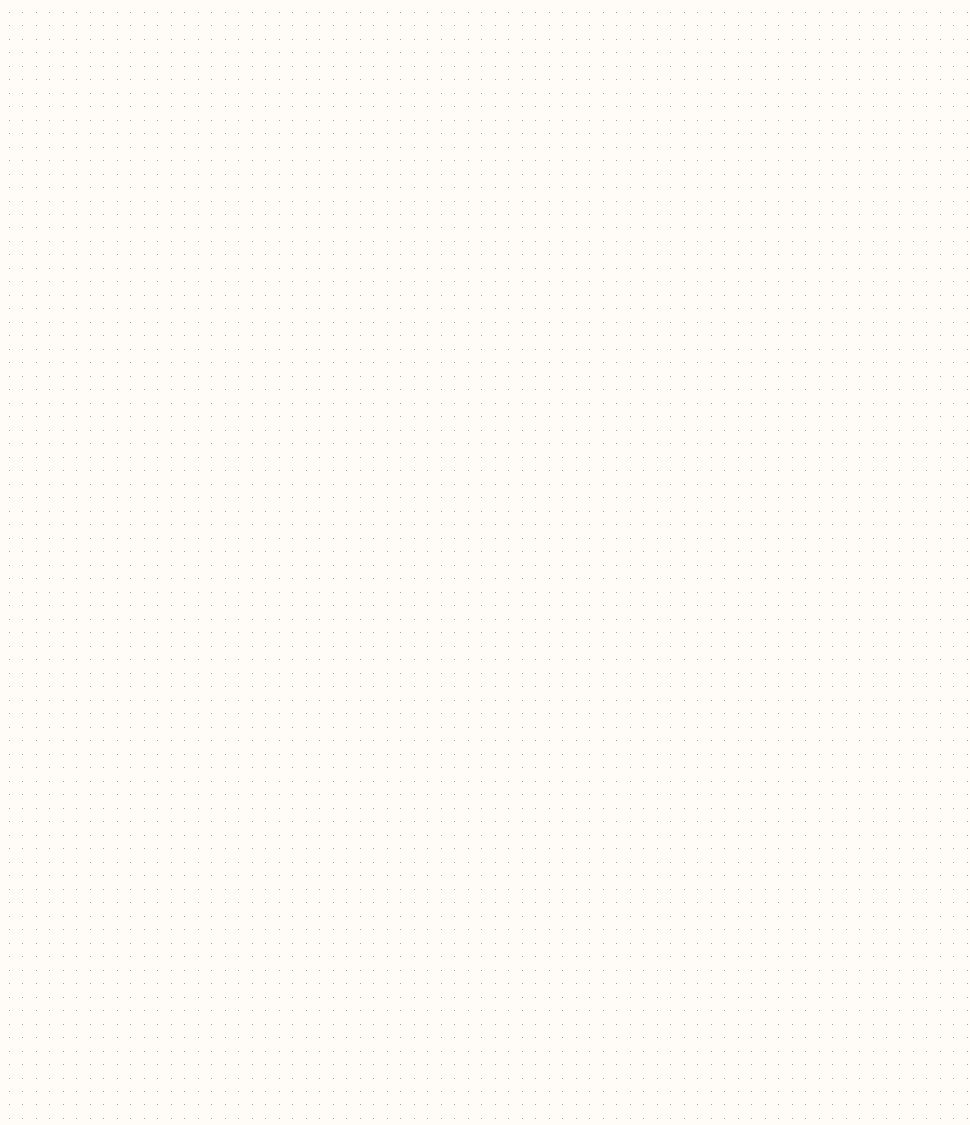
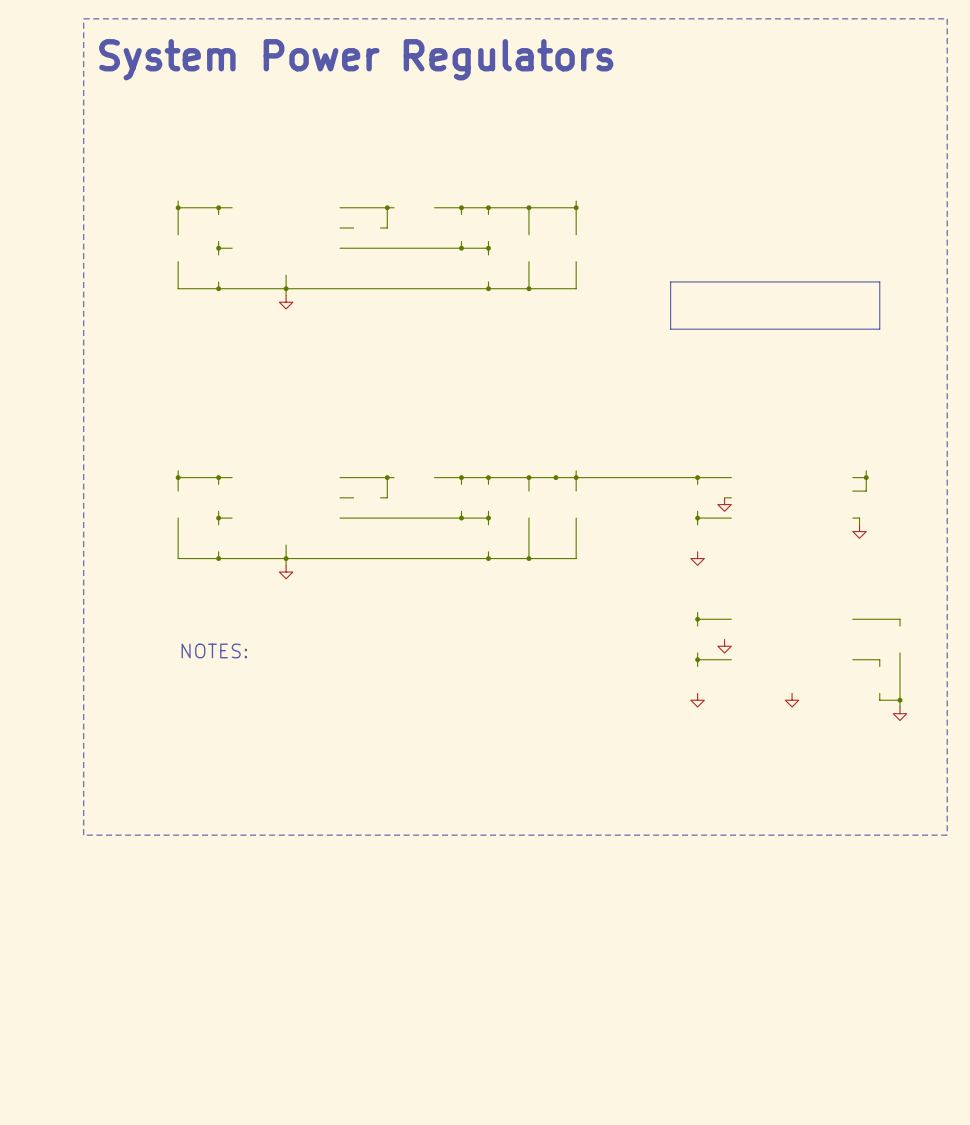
line: none -> (83, 18) (947, 18) (947, 835) (83, 835) (83, 18)
text: none -> System Power Regulators (356, 59)
wire: none -> (178, 201) (178, 234)
wire: none -> (576, 201) (576, 234)
wire: none -> (178, 207) (232, 207)
junction: none -> (178, 207)
wire: none -> (218, 207) (218, 214)
junction: none -> (218, 207)
wire: none -> (340, 207) (394, 207)
wire: none -> (387, 207) (387, 227) (380, 227)
junction: none -> (387, 207)
wire: none -> (434, 207) (576, 207)
wire: none -> (461, 207) (461, 214)
junction: none -> (461, 207)
wire: none -> (488, 207) (488, 214)
junction: none -> (488, 207)
wire: none -> (528, 207) (528, 234)
junction: none -> (528, 207)
junction: none -> (576, 207)
wire: none -> (340, 227) (353, 227)
wire: none -> (218, 241) (218, 254)
wire: none -> (461, 241) (461, 248)
wire: none -> (488, 241) (488, 254)
wire: none -> (218, 248) (232, 248)
junction: none -> (218, 248)
wire: none -> (340, 248) (488, 248)
junction: none -> (461, 248)
junction: none -> (488, 248)
wire: none -> (178, 261) (178, 288) (576, 288) (576, 261)
wire: none -> (528, 261) (528, 288)
wire: none -> (286, 275) (286, 295)
wire: none -> (218, 281) (218, 288)
wire: none -> (488, 281) (488, 288)
line: none -> (670, 281) (879, 281) (879, 329) (670, 329) (670, 281)
junction: none -> (218, 288)
junction: none -> (286, 288)
junction: none -> (488, 288)
junction: none -> (528, 288)
power symbol: none -> (286, 302)
wire: none -> (178, 470) (178, 491)
wire: none -> (576, 470) (576, 491)
wire: none -> (866, 470) (866, 491) (852, 491)
wire: none -> (178, 477) (232, 477)
junction: none -> (178, 477)
wire: none -> (218, 477) (218, 484)
junction: none -> (218, 477)
wire: none -> (340, 477) (394, 477)
wire: none -> (387, 477) (387, 497) (380, 497)
junction: none -> (387, 477)
wire: none -> (434, 477) (731, 477)
wire: none -> (461, 477) (461, 484)
junction: none -> (461, 477)
wire: none -> (488, 477) (488, 484)
junction: none -> (488, 477)
wire: none -> (528, 477) (528, 491)
junction: none -> (528, 477)
junction: none -> (555, 477)
junction: none -> (576, 477)
wire: none -> (697, 477) (697, 484)
junction: none -> (697, 477)
wire: none -> (852, 477) (866, 477)
junction: none -> (866, 477)
wire: none -> (340, 497) (353, 497)
wire: none -> (724, 497) (731, 497)
power symbol: none -> (724, 504)
wire: none -> (218, 511) (218, 524)
wire: none -> (461, 511) (461, 518)
wire: none -> (488, 511) (488, 524)
wire: none -> (697, 511) (697, 524)
wire: none -> (178, 518) (178, 558) (576, 558) (576, 518)
wire: none -> (218, 518) (232, 518)
junction: none -> (218, 518)
wire: none -> (340, 518) (488, 518)
junction: none -> (461, 518)
junction: none -> (488, 518)
wire: none -> (528, 518) (528, 558)
wire: none -> (697, 518) (731, 518)
junction: none -> (697, 518)
wire: none -> (852, 518) (859, 518) (859, 524)
power symbol: none -> (859, 531)
wire: none -> (286, 545) (286, 565)
wire: none -> (218, 551) (218, 558)
wire: none -> (488, 551) (488, 558)
junction: none -> (218, 558)
junction: none -> (286, 558)
junction: none -> (488, 558)
junction: none -> (528, 558)
power symbol: none -> (697, 558)
power symbol: none -> (286, 572)
wire: none -> (697, 612) (697, 626)
wire: none -> (697, 619) (731, 619)
junction: none -> (697, 619)
wire: none -> (852, 619) (899, 619) (899, 626)
power symbol: none -> (724, 646)
text: none -> NOTES: (214, 650)
wire: none -> (697, 653) (697, 666)
wire: none -> (899, 653) (899, 706)
wire: none -> (697, 659) (731, 659)
junction: none -> (697, 659)
wire: none -> (852, 659) (879, 659) (879, 666)
wire: none -> (879, 693) (879, 700) (899, 700)
power symbol: none -> (697, 700)
power symbol: none -> (792, 700)
junction: none -> (899, 700)
power symbol: none -> (899, 713)

